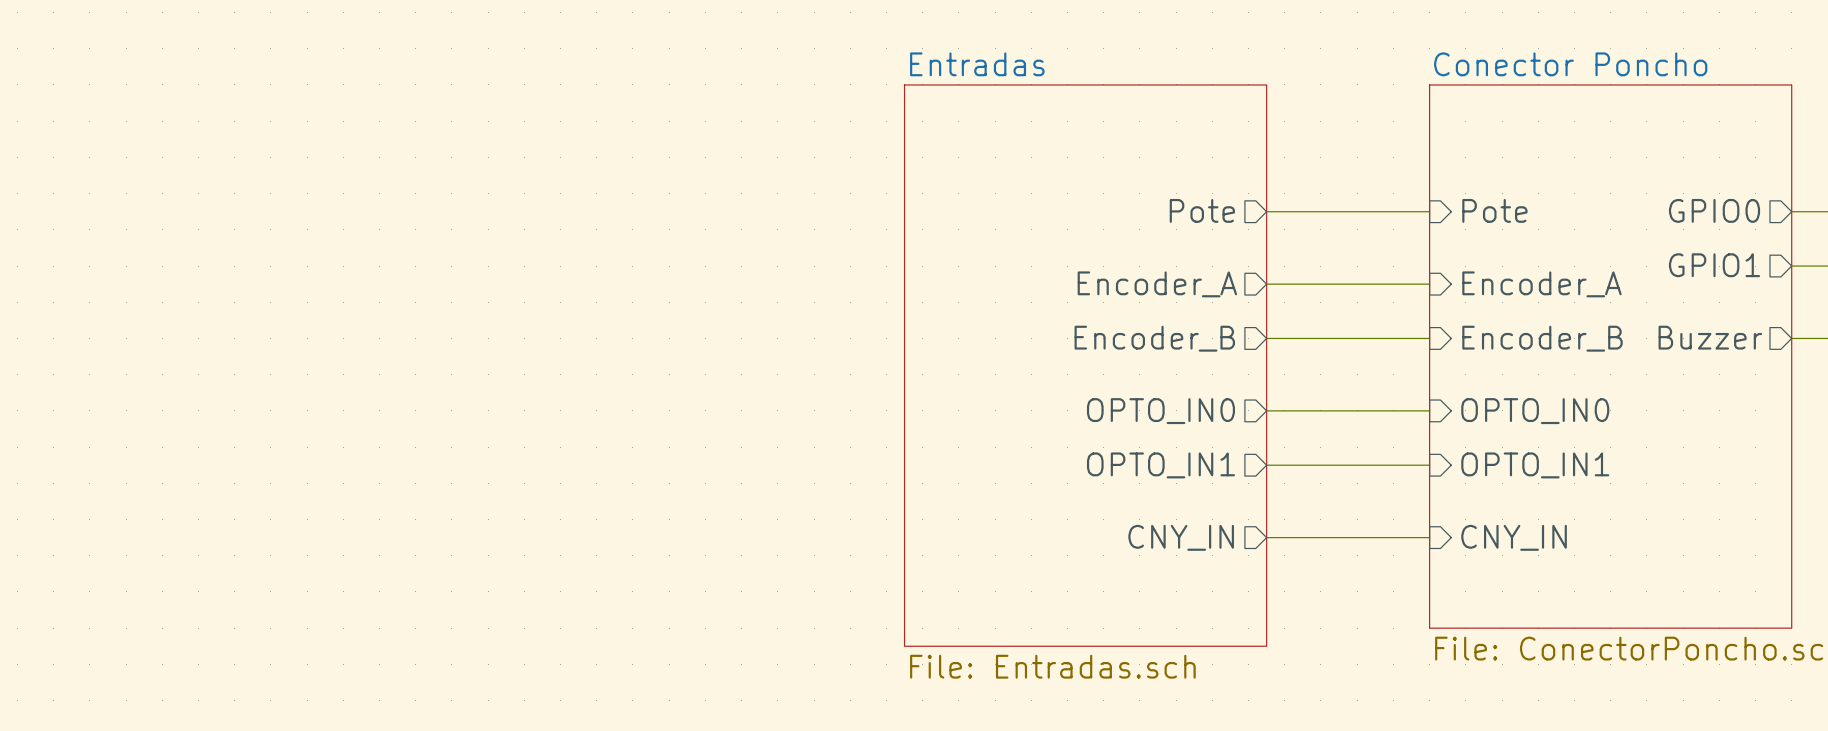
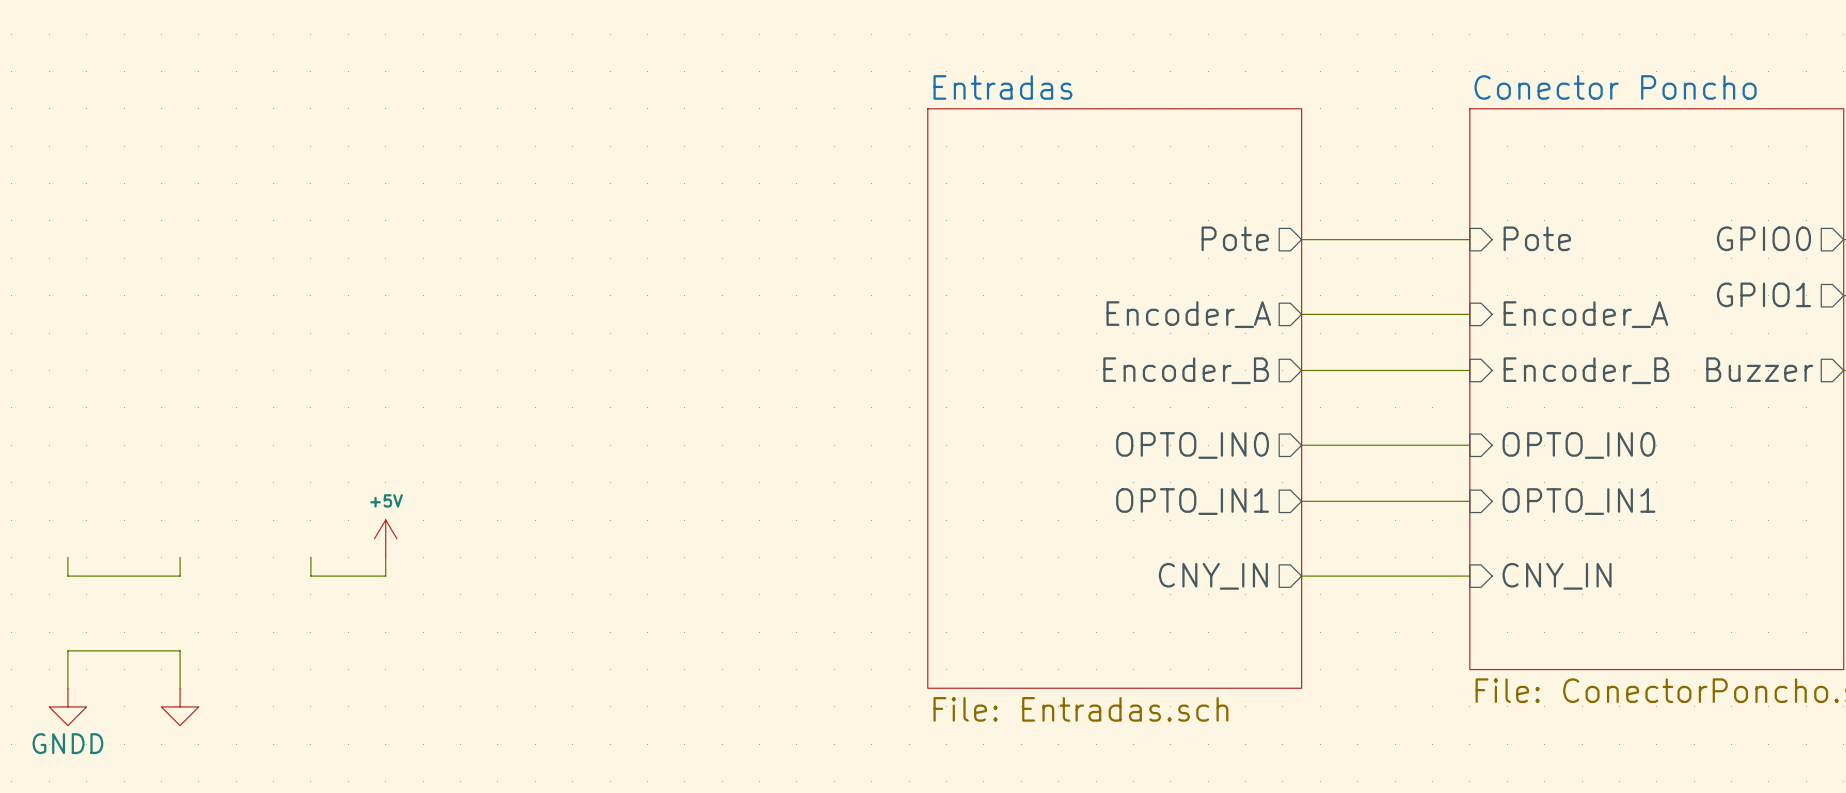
power symbol: none -> +5V (385, 538)
wire: none -> (67, 557) (67, 576) (180, 576) (180, 557)
wire: none -> (310, 557) (310, 576) (385, 576) (385, 557)
wire: none -> (67, 688) (67, 650) (180, 650) (180, 688)
power symbol: none -> GNDD (67, 706)
power symbol: none -> (180, 706)

